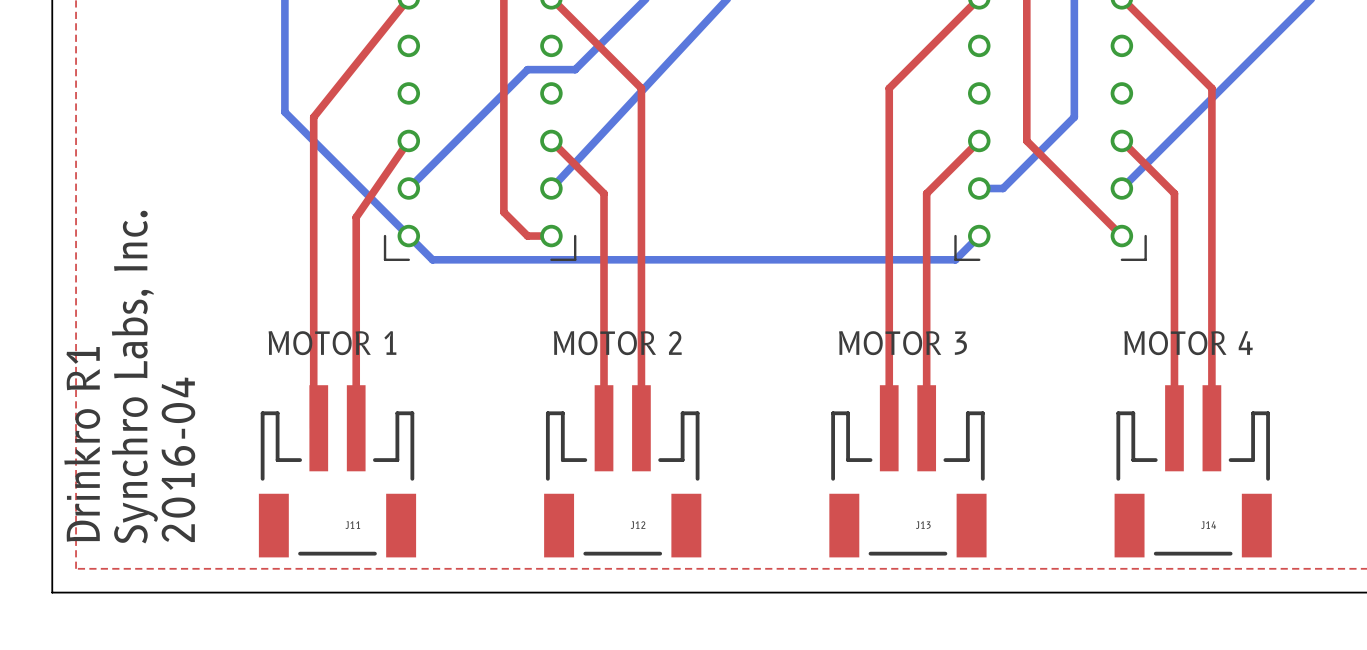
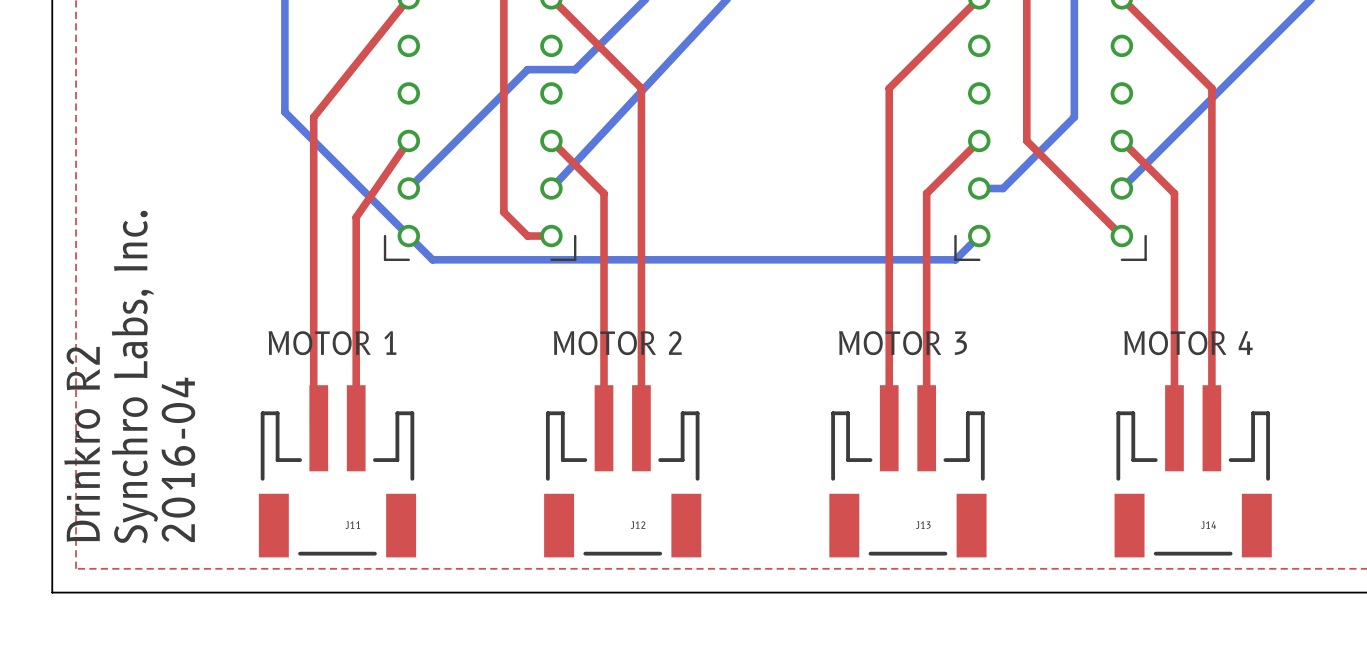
text: Drinkro R1 (82, 444) -> Drinkro R2 (82, 444)

